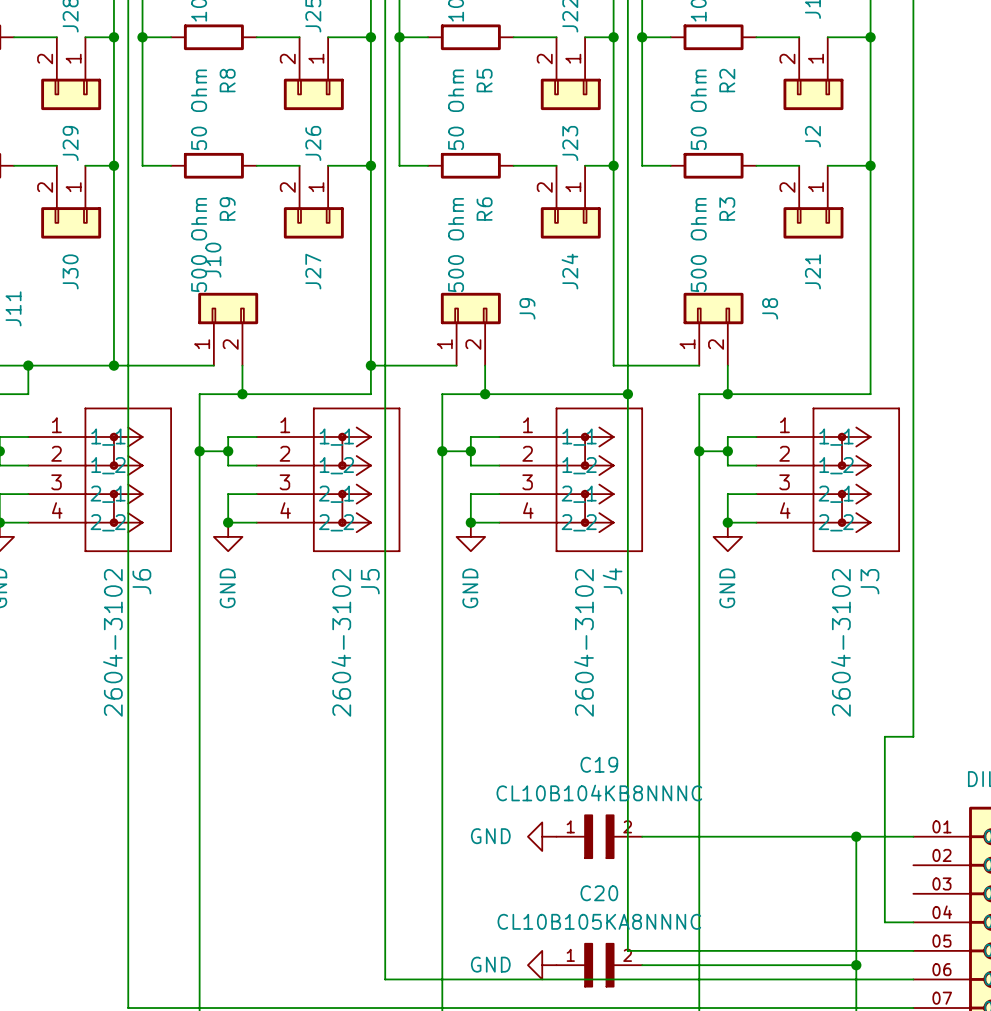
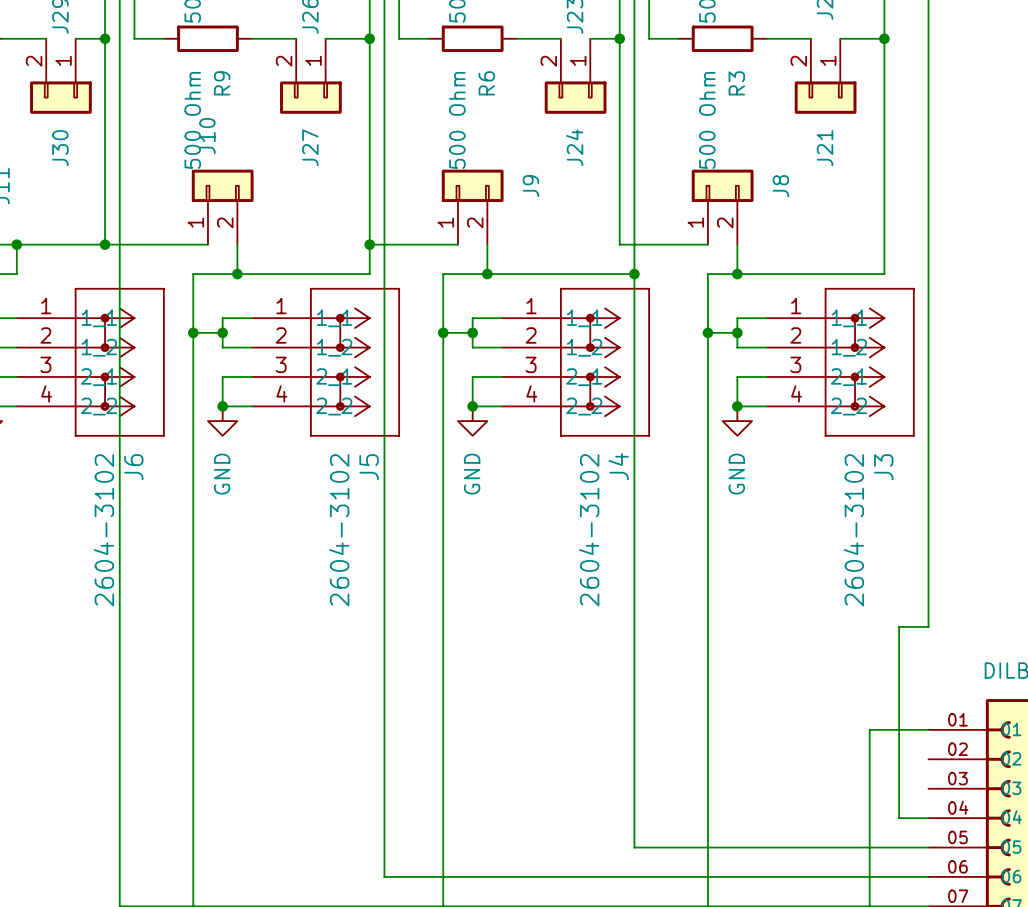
power symbol: GND (542, 836) -> none
C19: CL10B104KB8NNNC (599, 836) -> none
wire: (642, 836) (856, 836) -> none
junction: (856, 836) -> none
power symbol: GND (542, 965) -> none
C20: CL10B105KA8NNNC (599, 965) -> none
wire: (642, 965) (856, 965) -> none
junction: (856, 965) -> none

